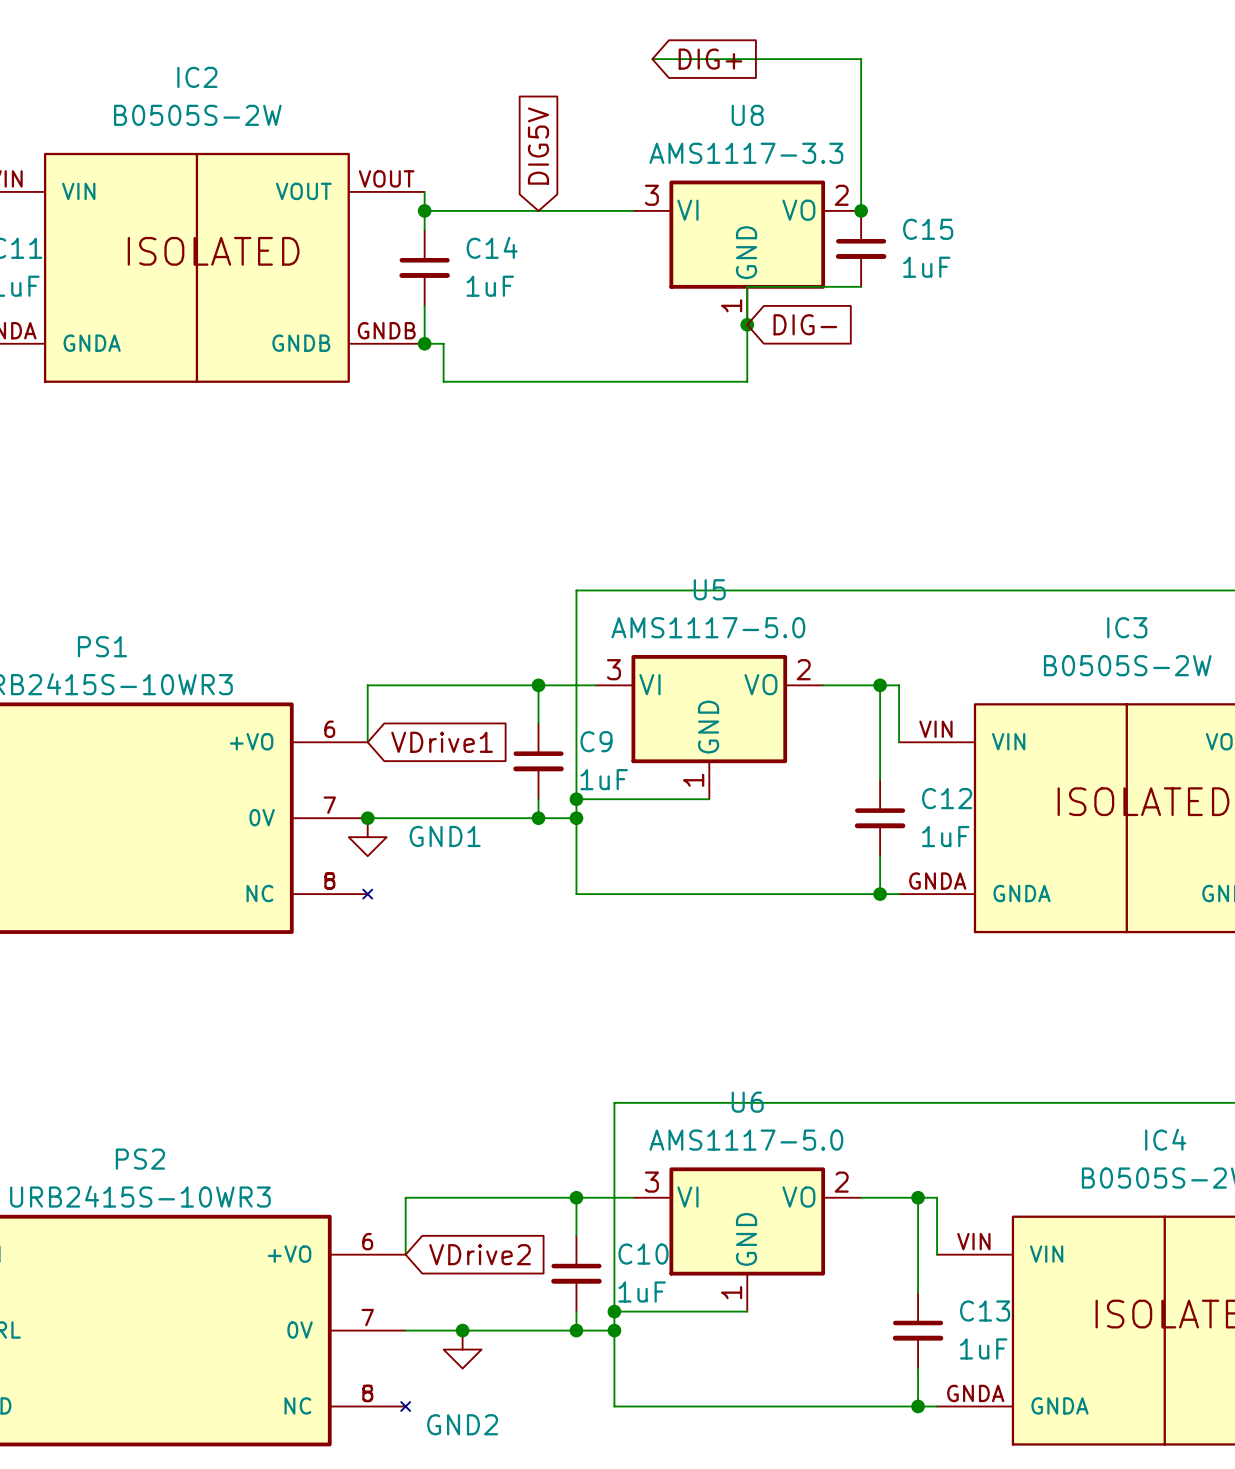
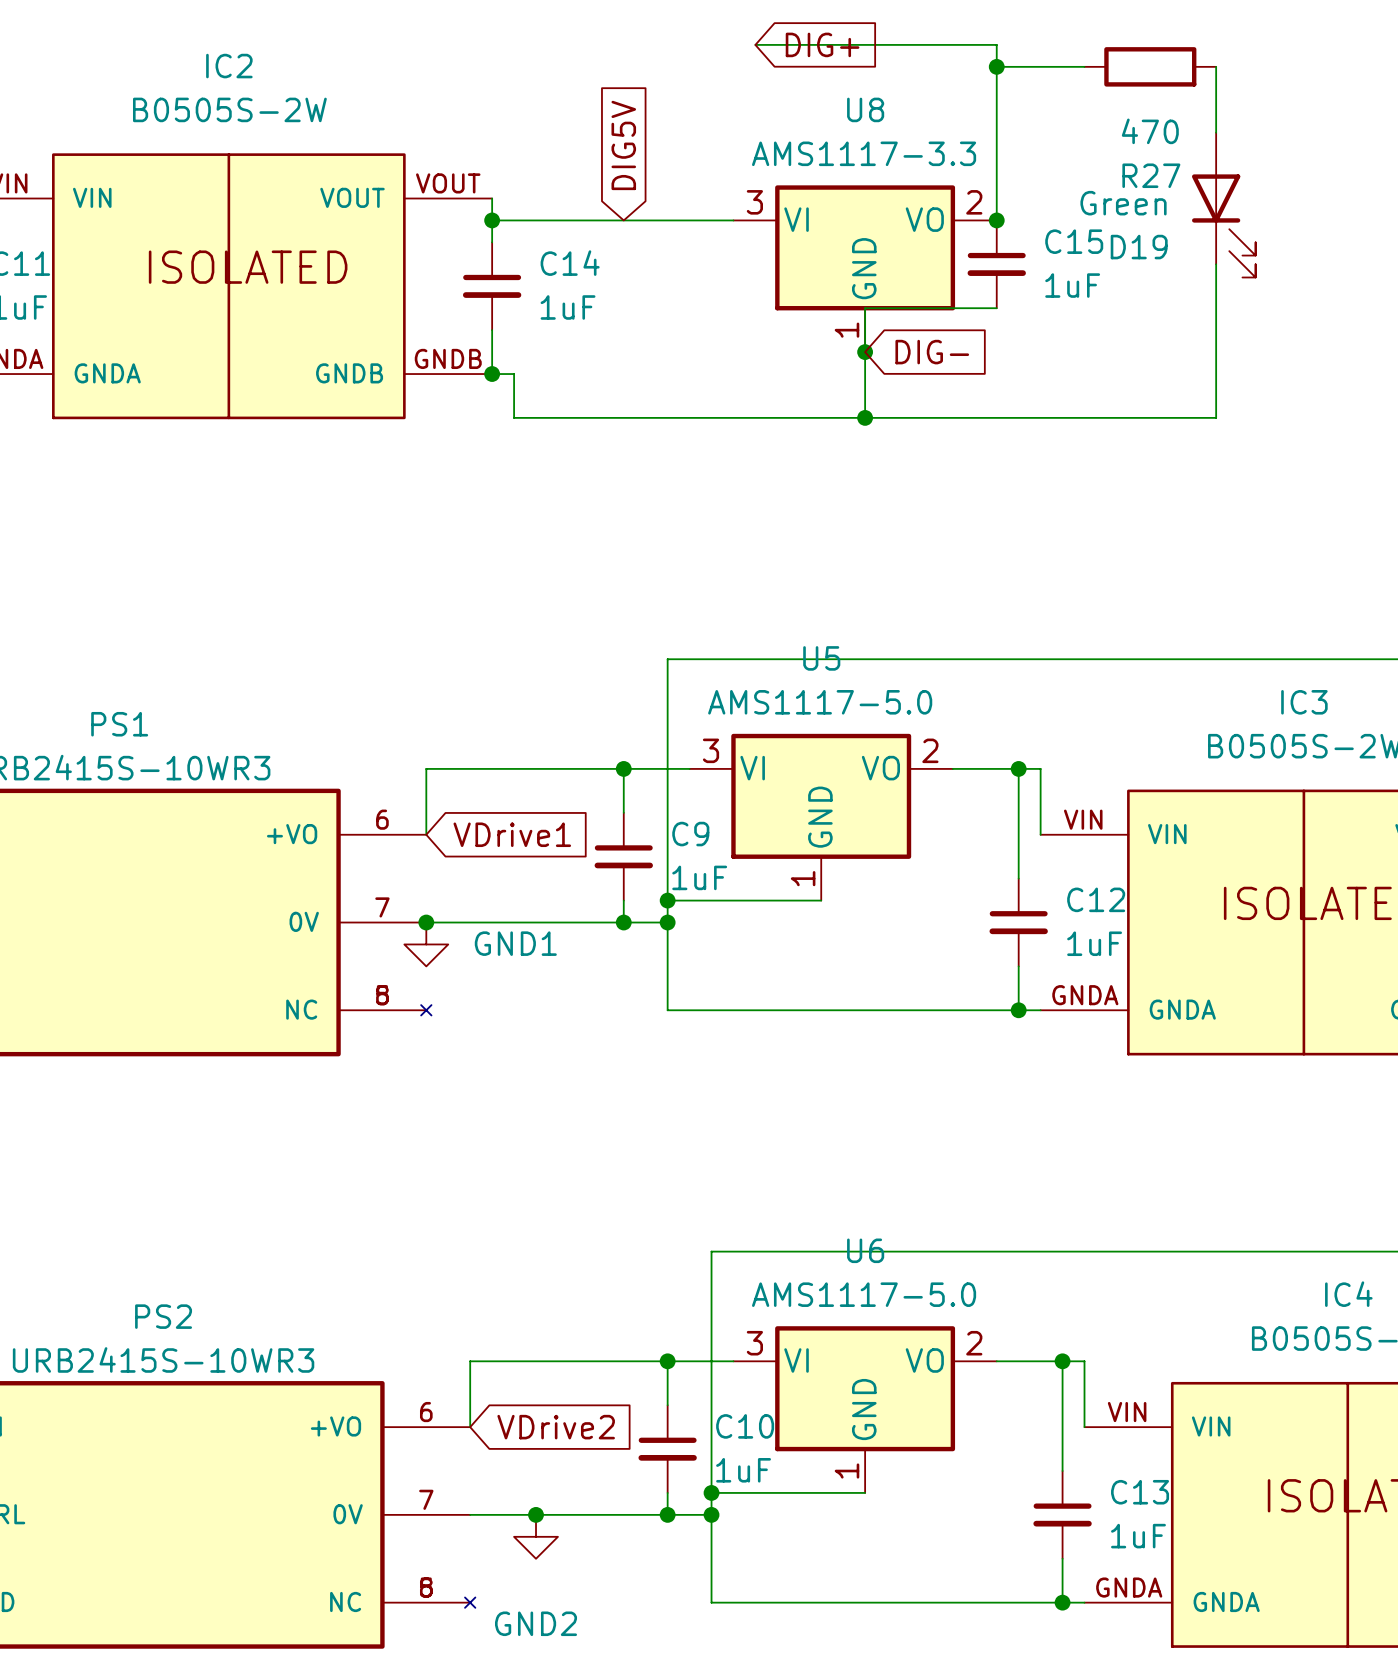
wire: none -> (996, 66) (1084, 66)
junction: none -> (996, 66)
R27: none -> 470 (1150, 66)
wire: none -> (1216, 66) (1216, 132)
D19: none -> Green (1223, 205)
wire: none -> (1216, 264) (1216, 417) (865, 417)
junction: none -> (865, 417)

